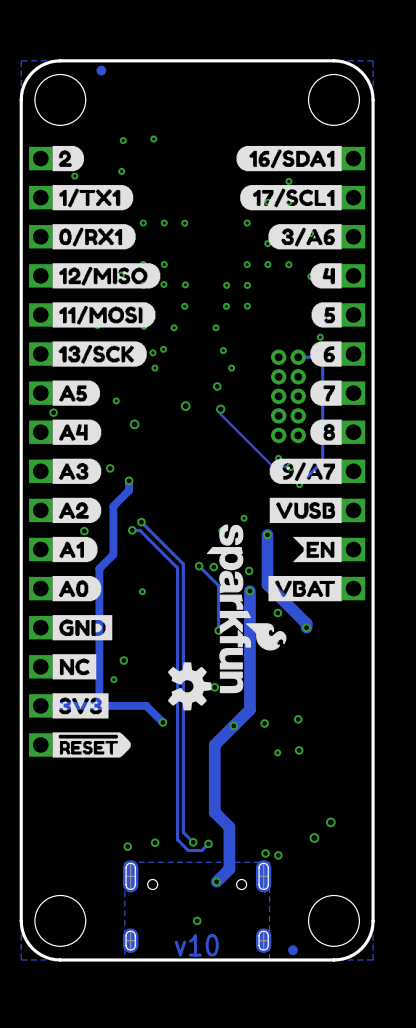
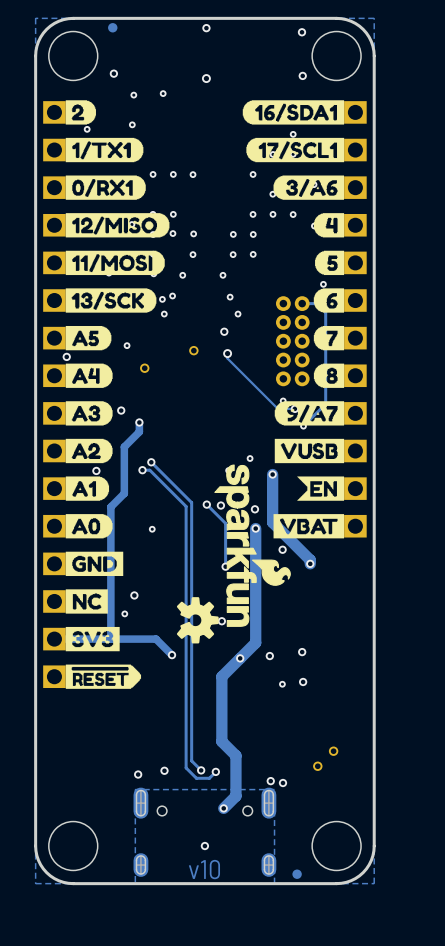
via: none -> (206, 28)
via: none -> (301, 32)
via: none -> (113, 73)
via: none -> (302, 75)
via: none -> (206, 78)

